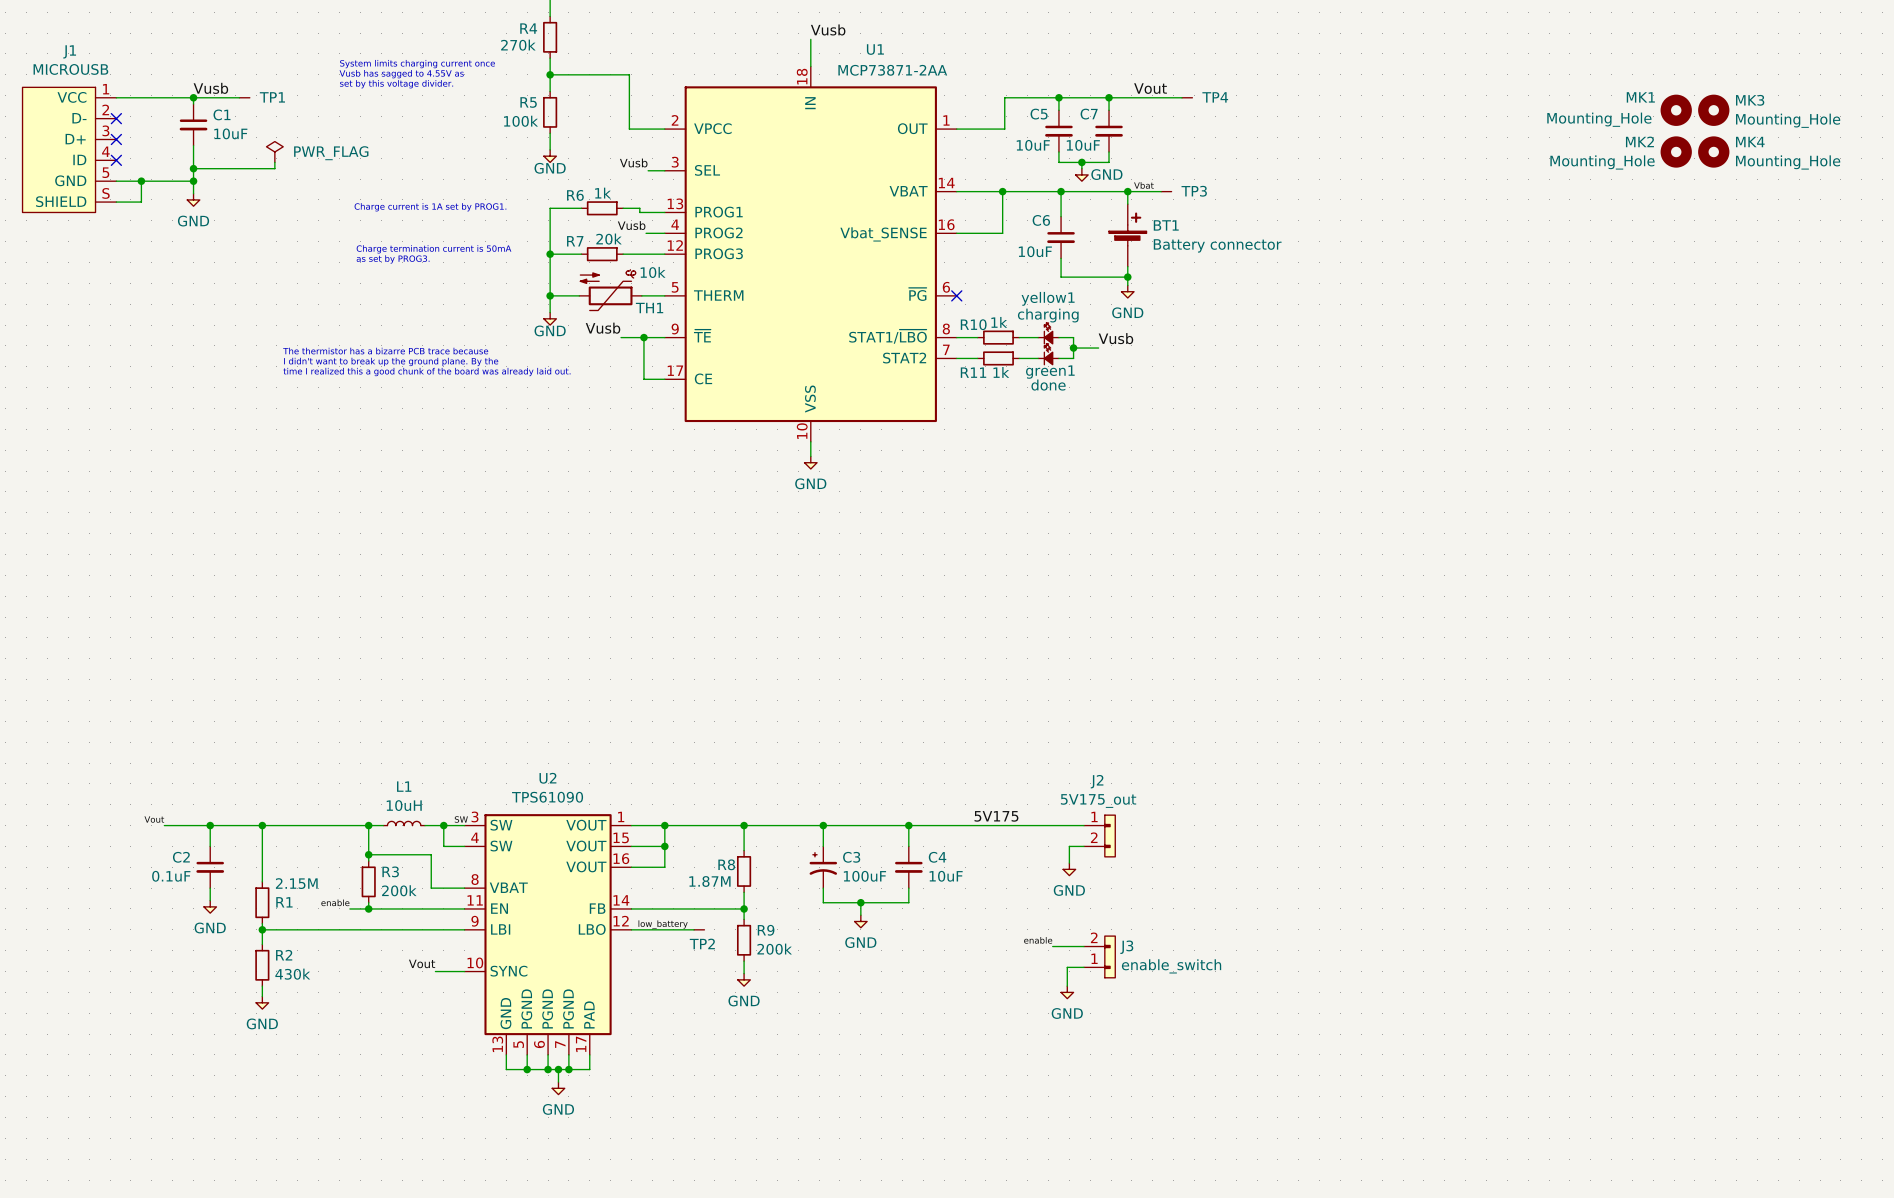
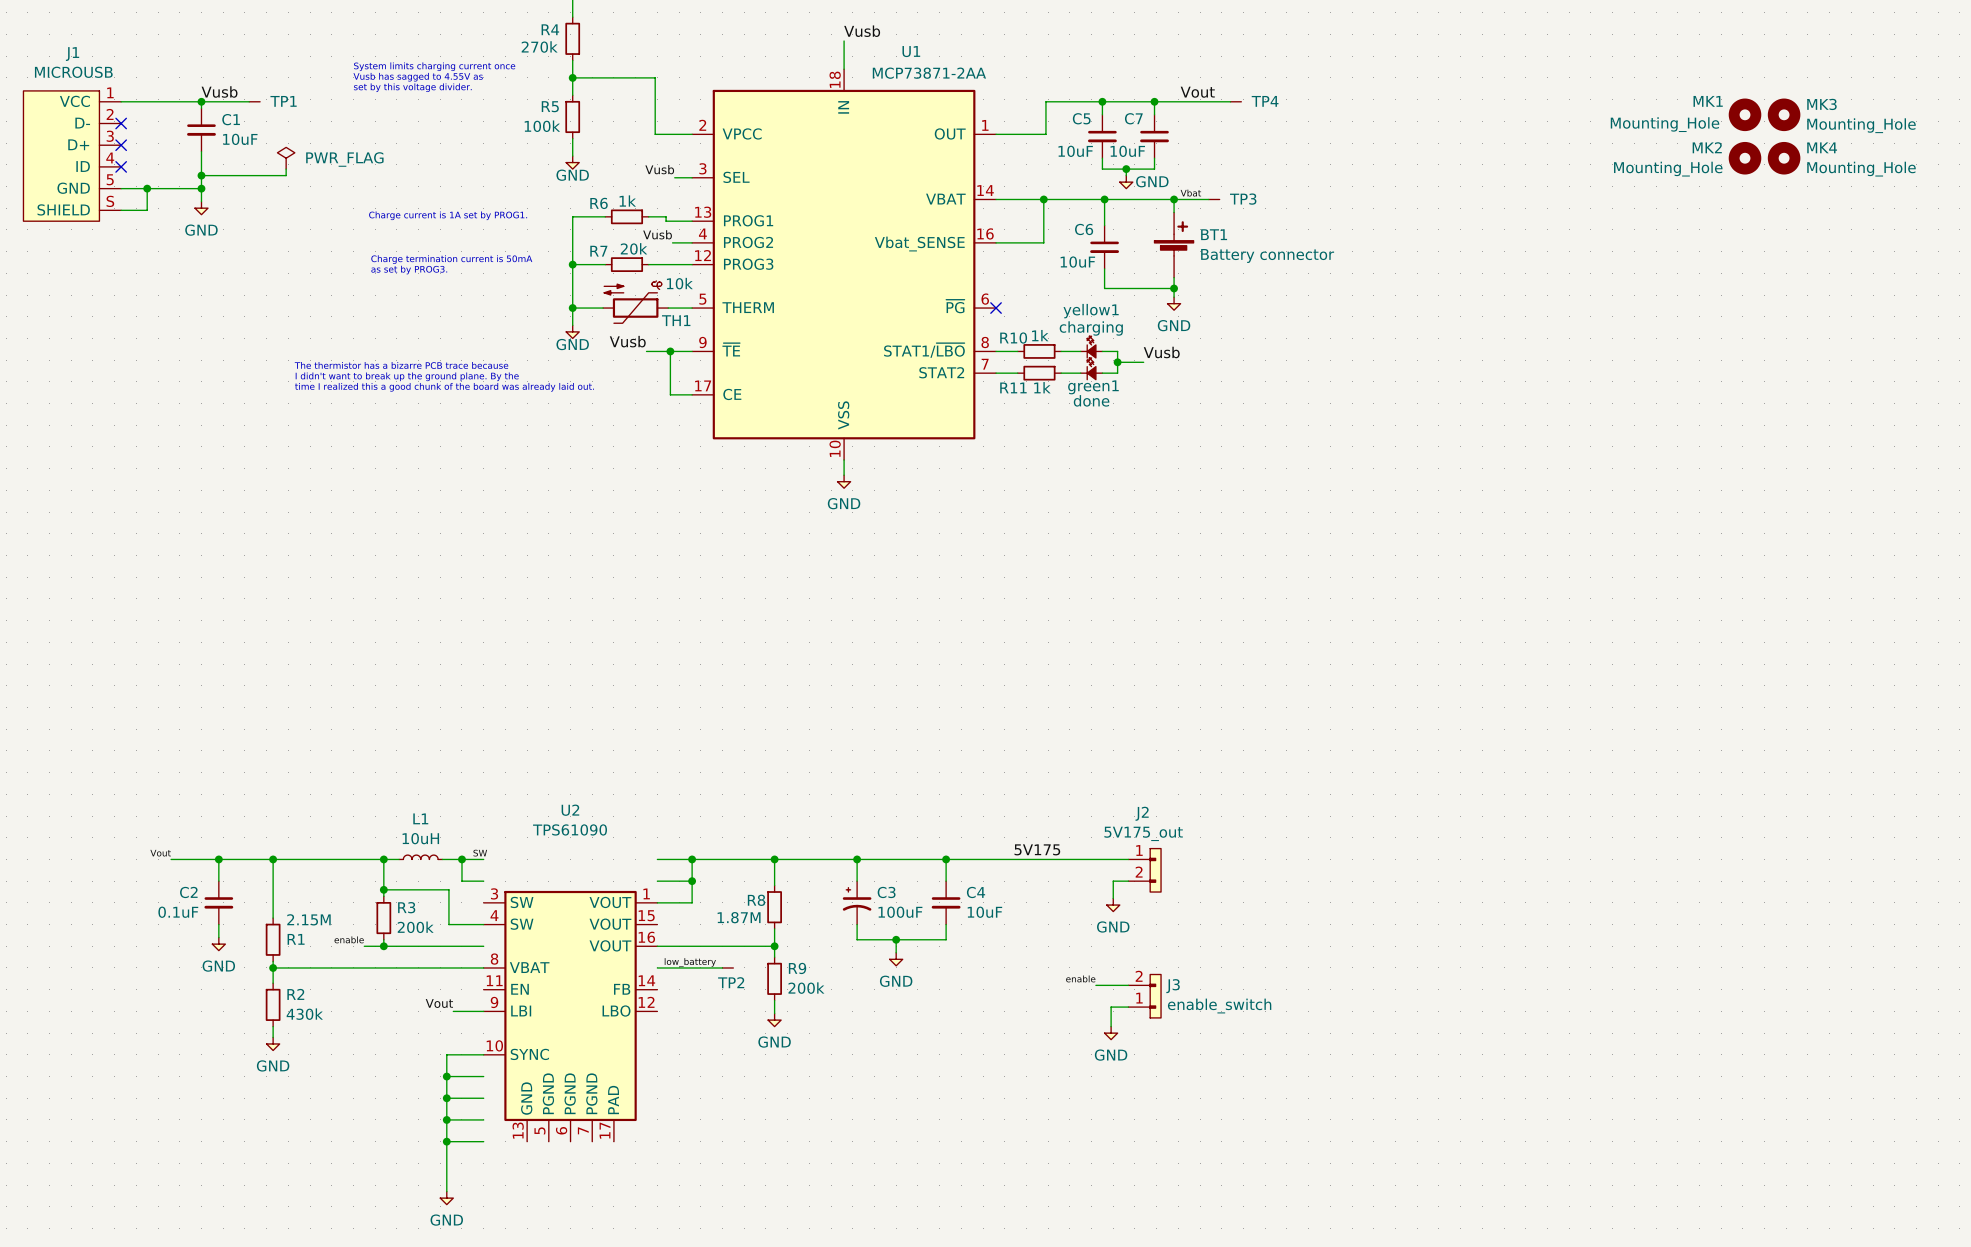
U2 position: (548, 934) -> (570, 1016)
wire: none -> (483, 1054) (446, 1054) (446, 1191)
wire: none -> (446, 1076) (483, 1076)
junction: none -> (446, 1076)
wire: none -> (446, 1098) (483, 1098)
junction: none -> (446, 1098)
junction: (527, 1069) -> none
junction: (548, 1069) -> none
junction: (558, 1069) -> none
junction: (568, 1069) -> none
wire: none -> (446, 1119) (483, 1119)
junction: none -> (446, 1119)
power symbol position: GND (558, 1088) -> GND (446, 1198)
wire: none -> (446, 1141) (483, 1141)
junction: none -> (446, 1141)

